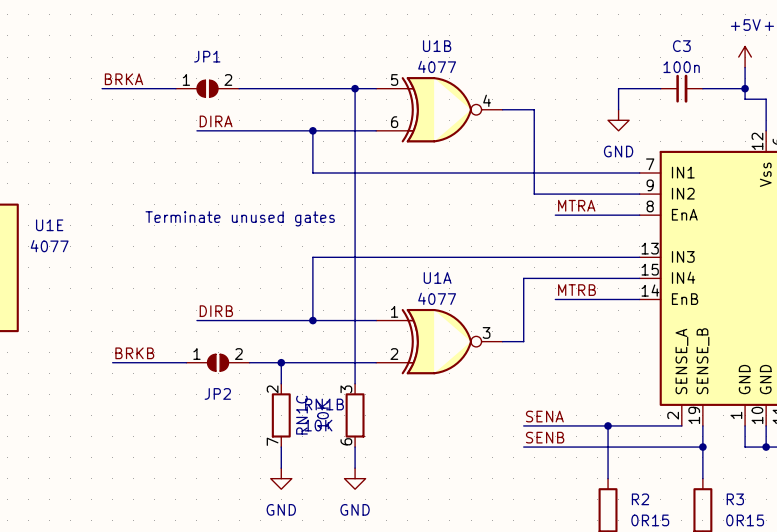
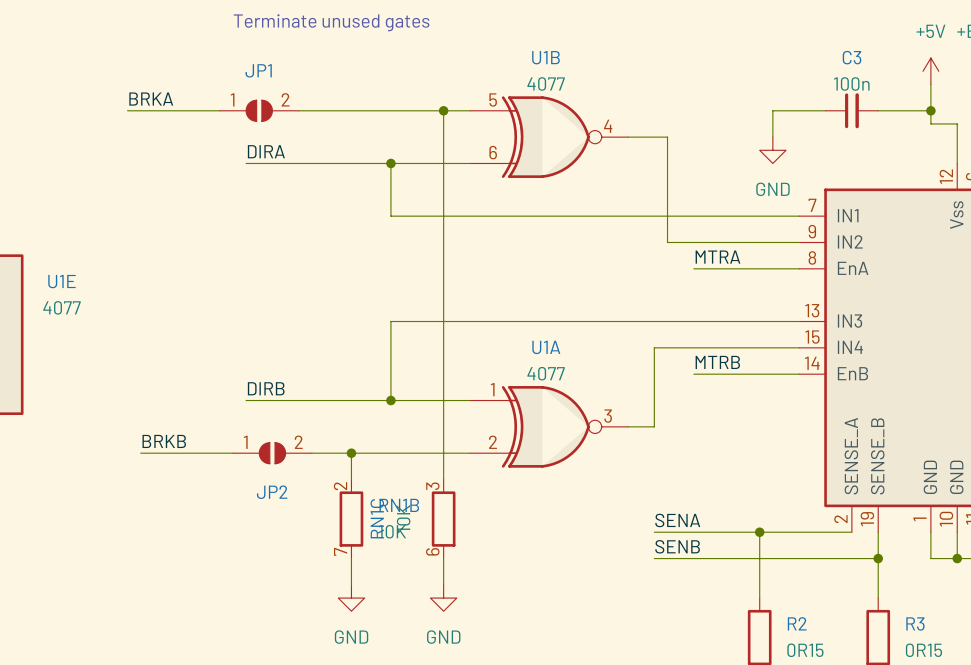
text position: Terminate unused gates (240, 218) -> Terminate unused gates (331, 22)

